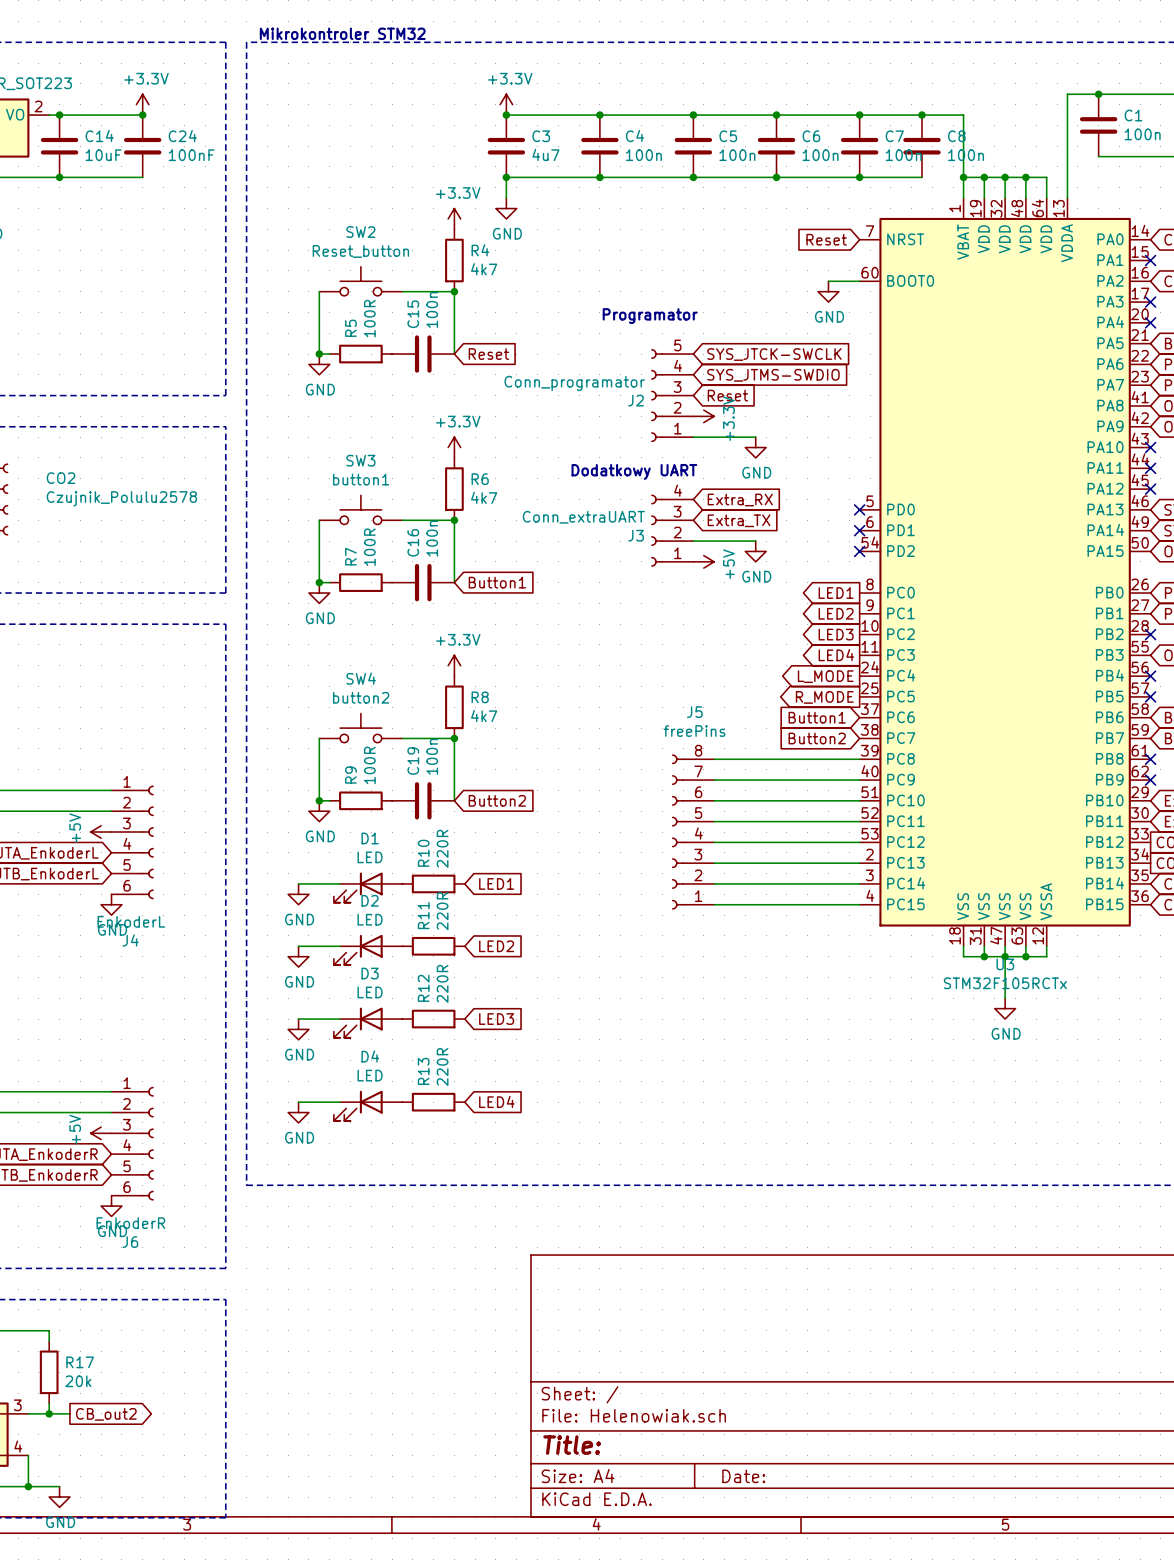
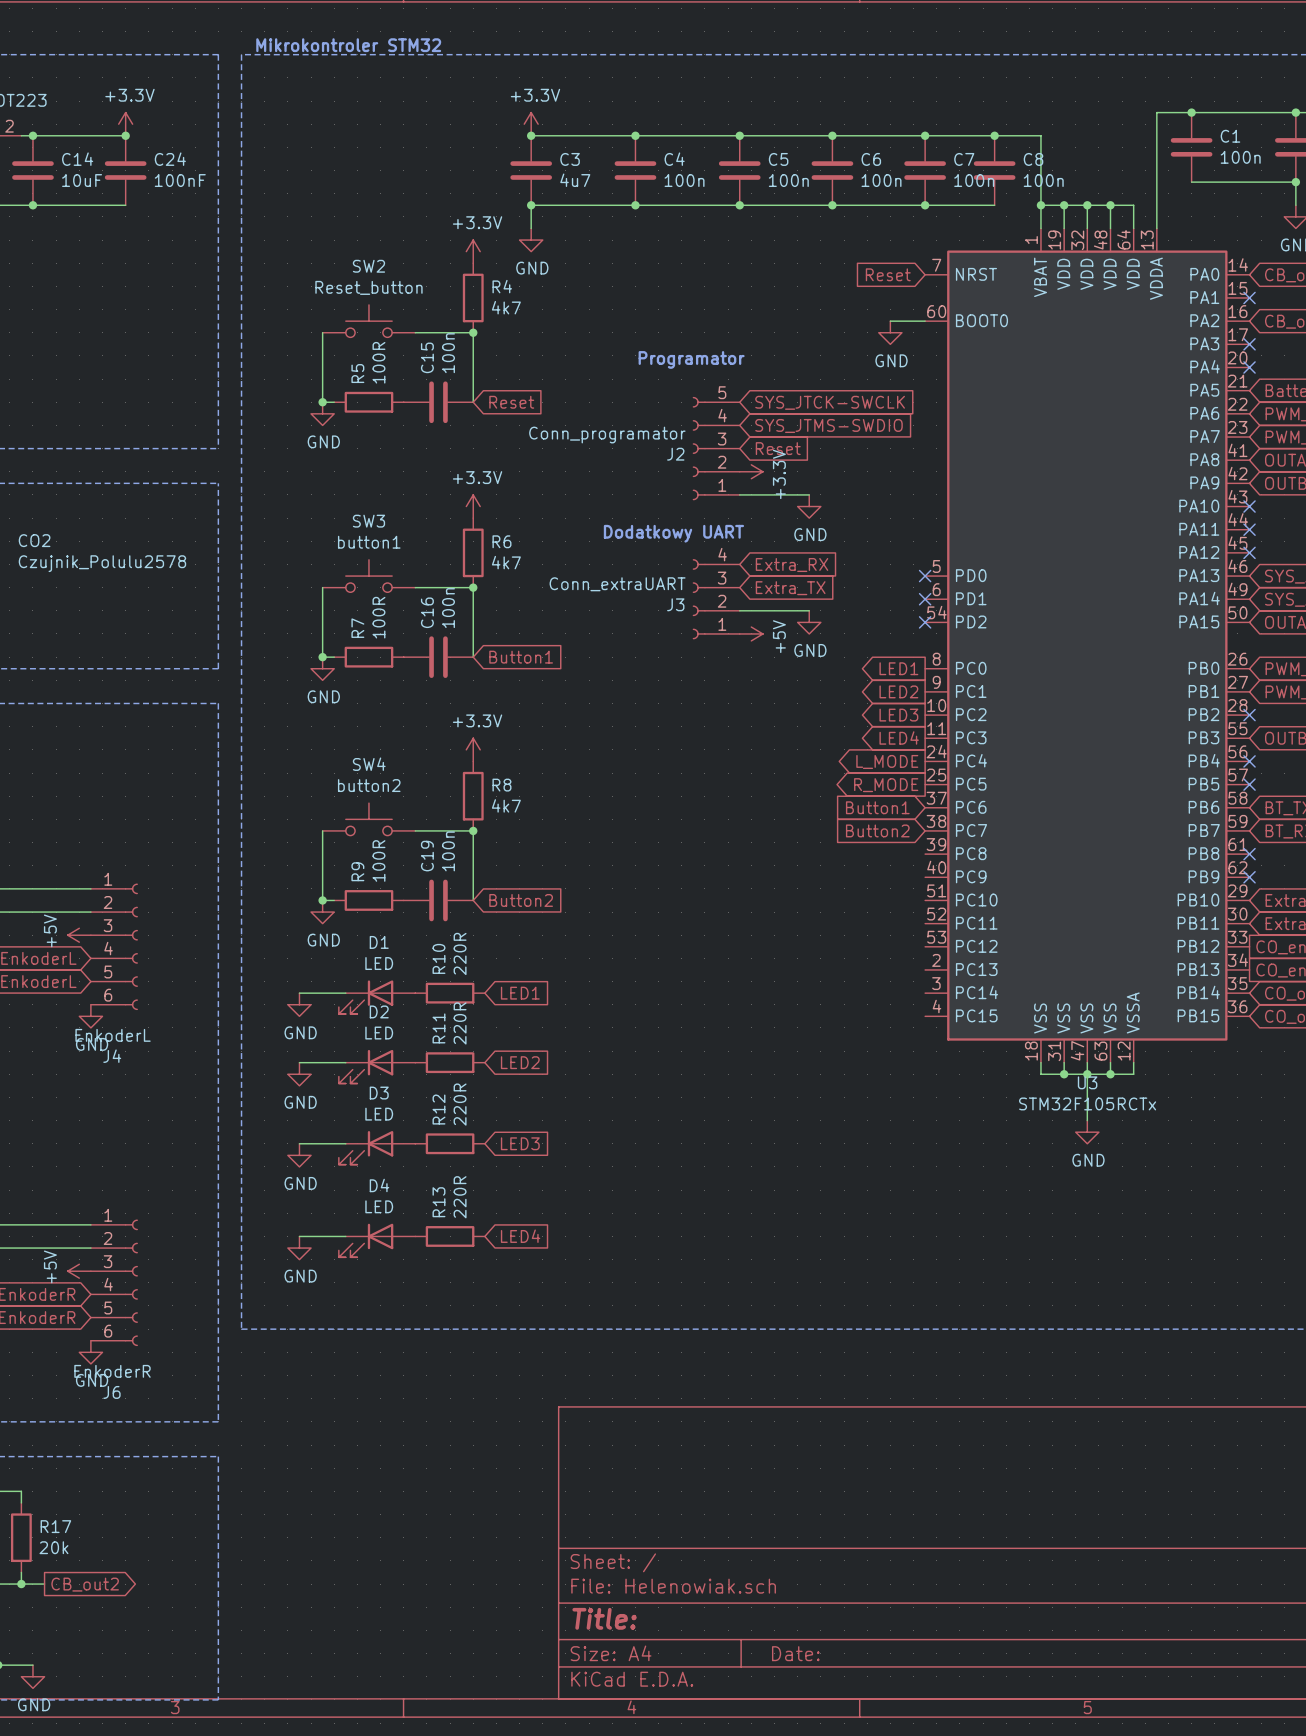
wire: (714, 759) (859, 759) -> none
wire: (714, 780) (859, 780) -> none
wire: (714, 800) (859, 800) -> none
wire: (714, 821) (859, 821) -> none
J5: freePins (693, 832) -> none
wire: (714, 842) (859, 842) -> none
wire: (714, 863) (859, 863) -> none
wire: (714, 883) (859, 883) -> none
wire: (714, 904) (859, 904) -> none

